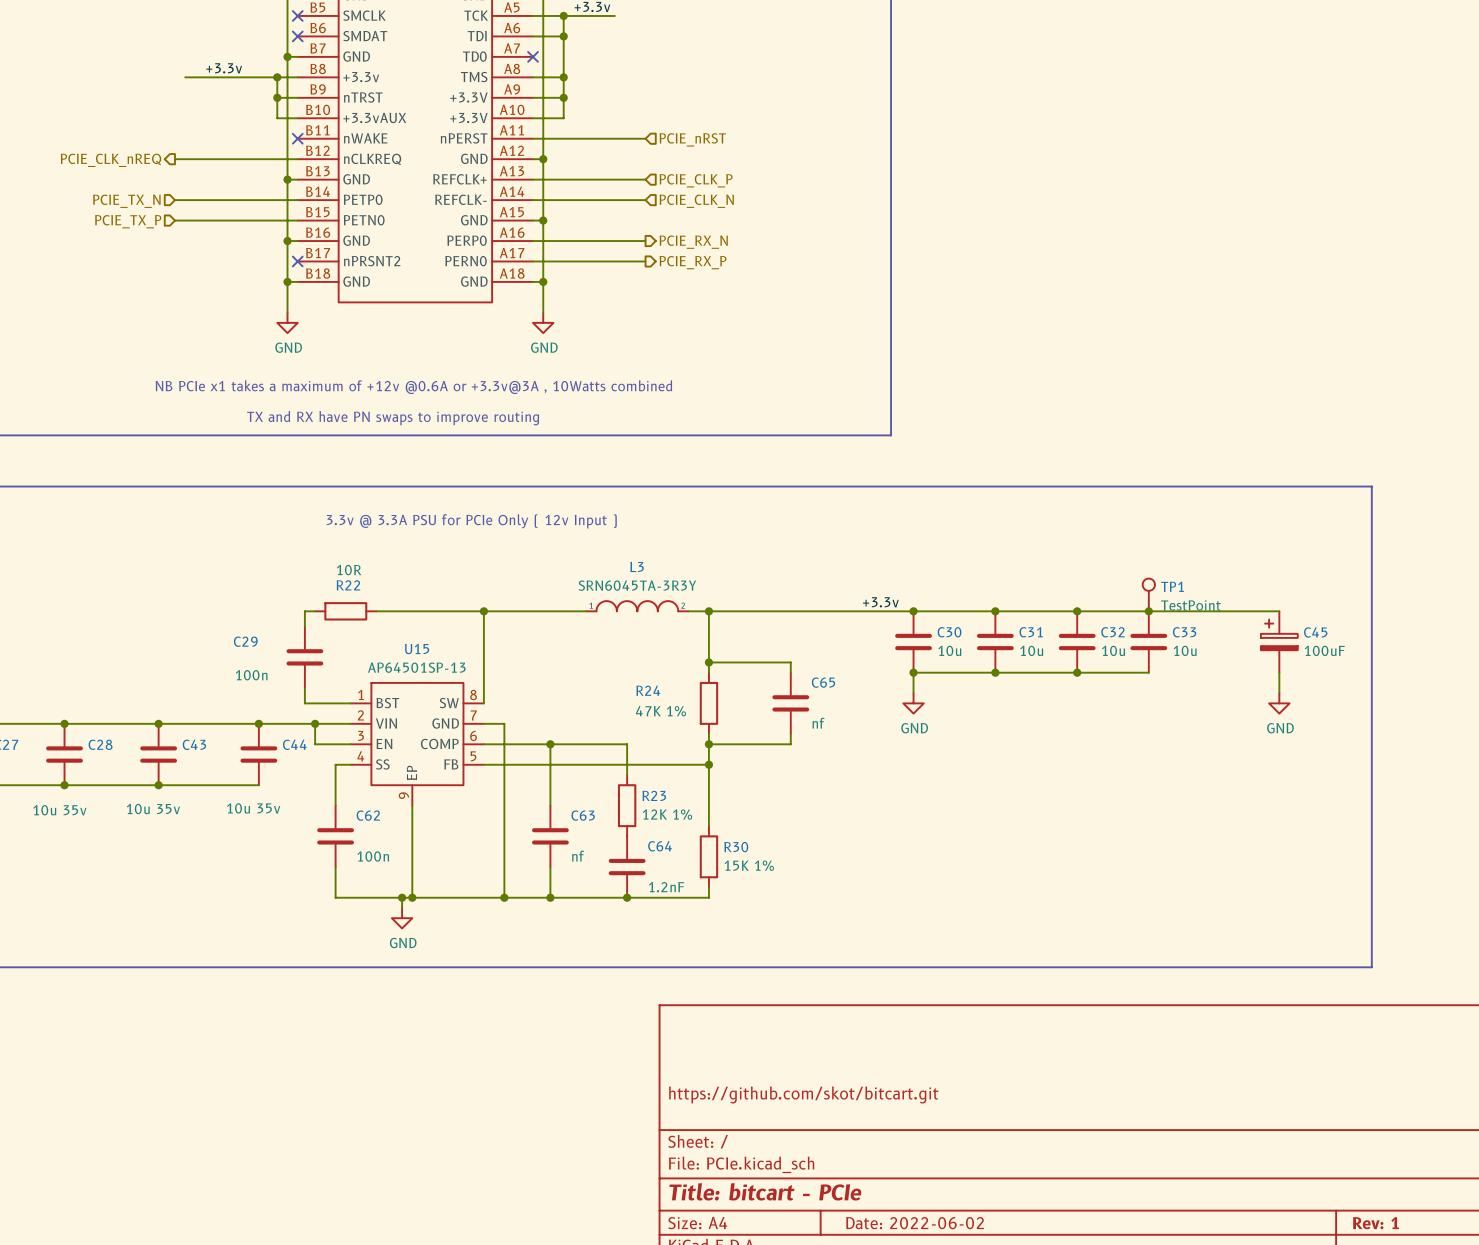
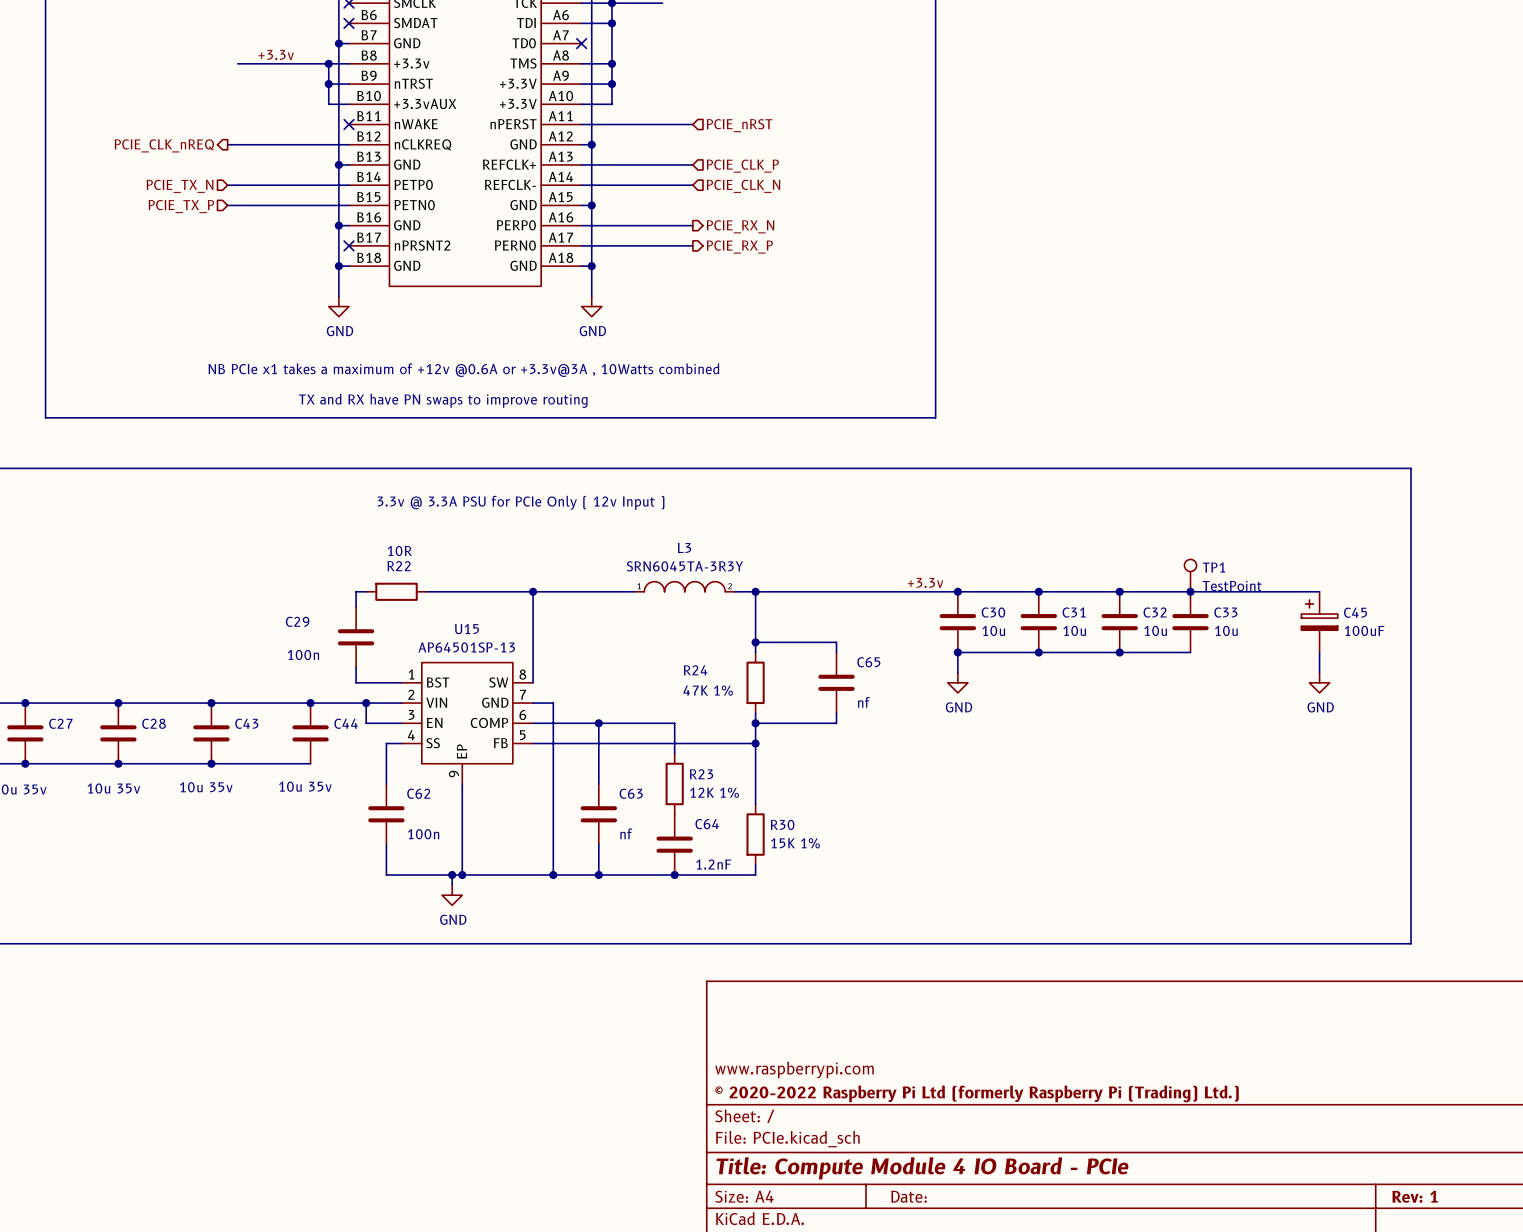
title block: https://github.com/skot/bitcart.git (803, 1095) -> www.raspberrypi.com (794, 1070)
title block: none -> © 2020-2022 Raspberry Pi Ltd (formerly Raspberry Pi (Trading) Ltd.) (977, 1093)
title block: Title: bitcart - PCIe (765, 1191) -> Title: Compute Module 4 IO Board - PCIe (922, 1168)
title block: Date: 2022-06-02 (915, 1223) -> Date: (909, 1196)

